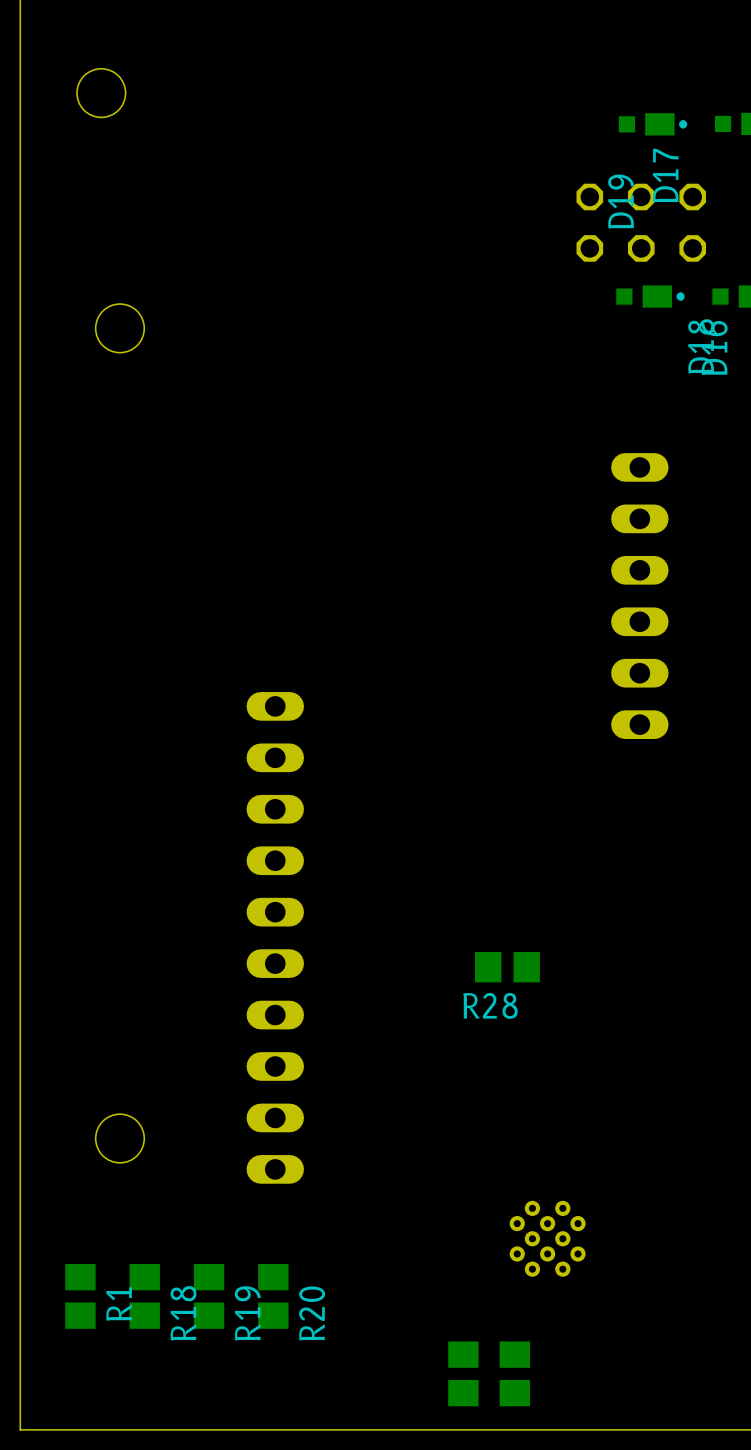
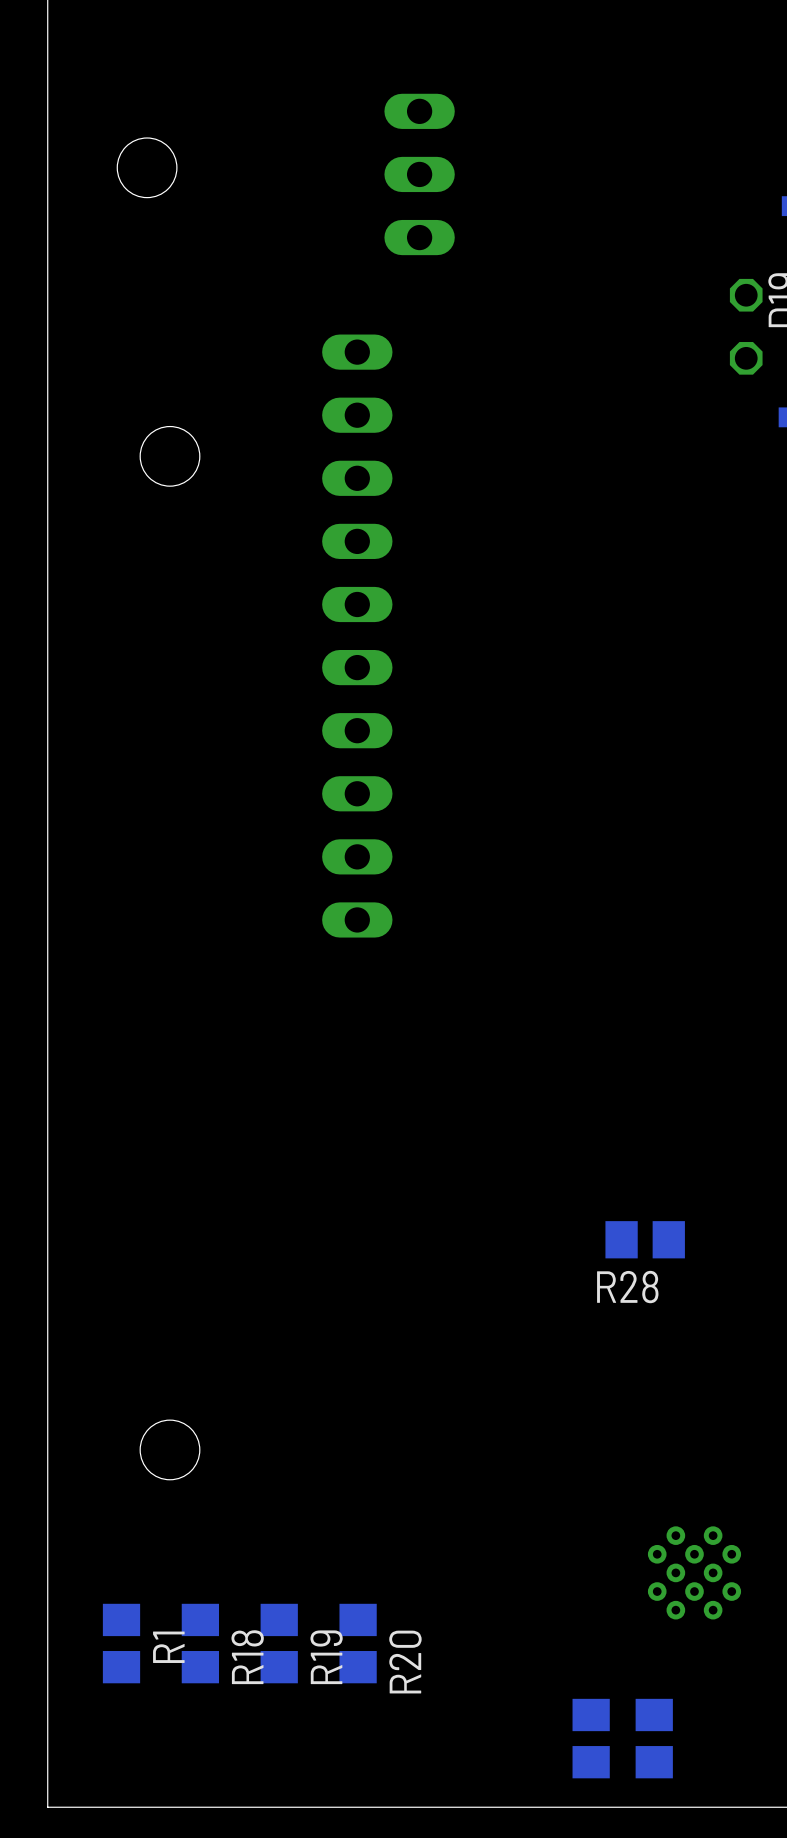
part: none -> (419, 174)
part position: (275, 937) -> (357, 636)

